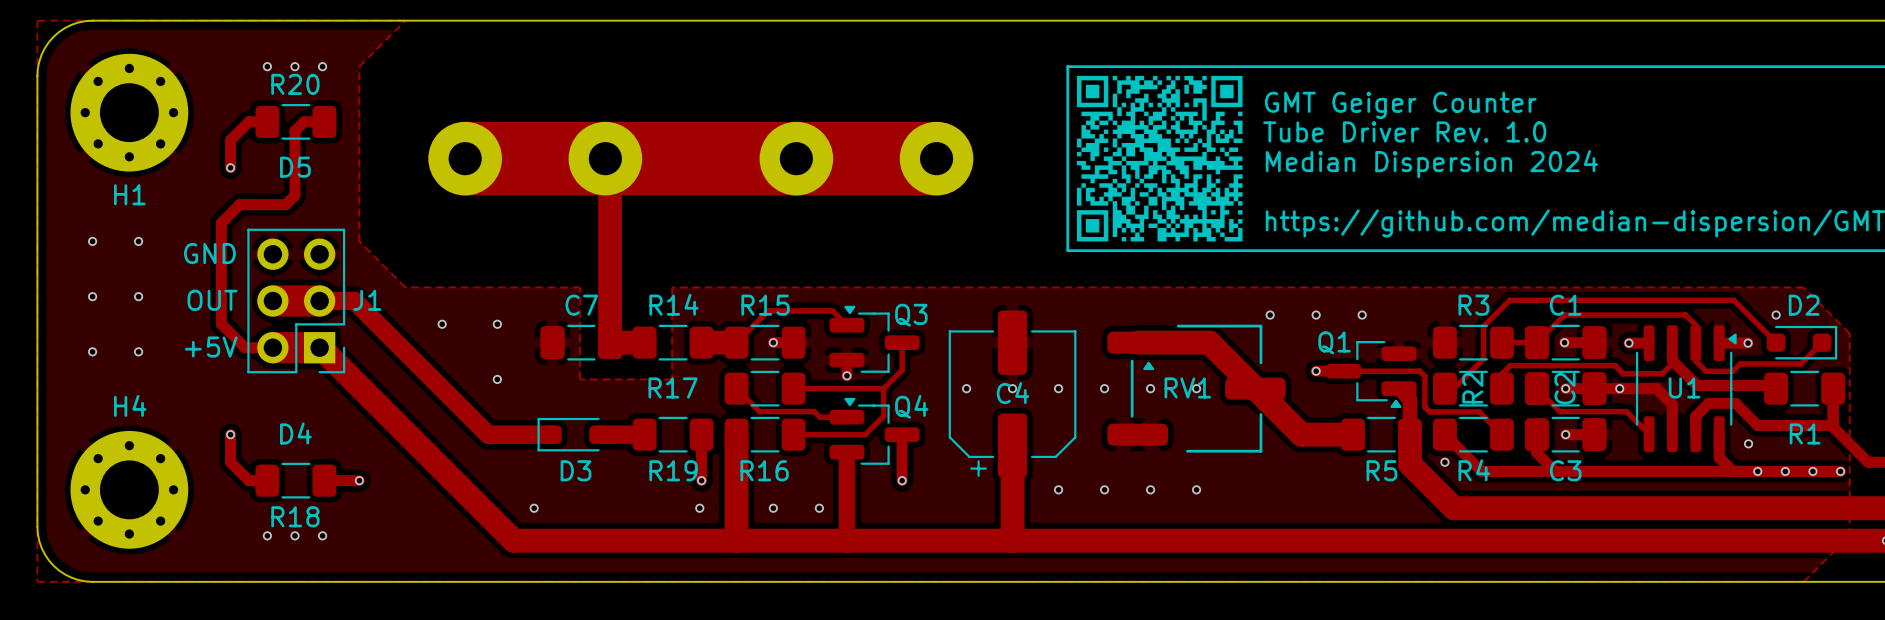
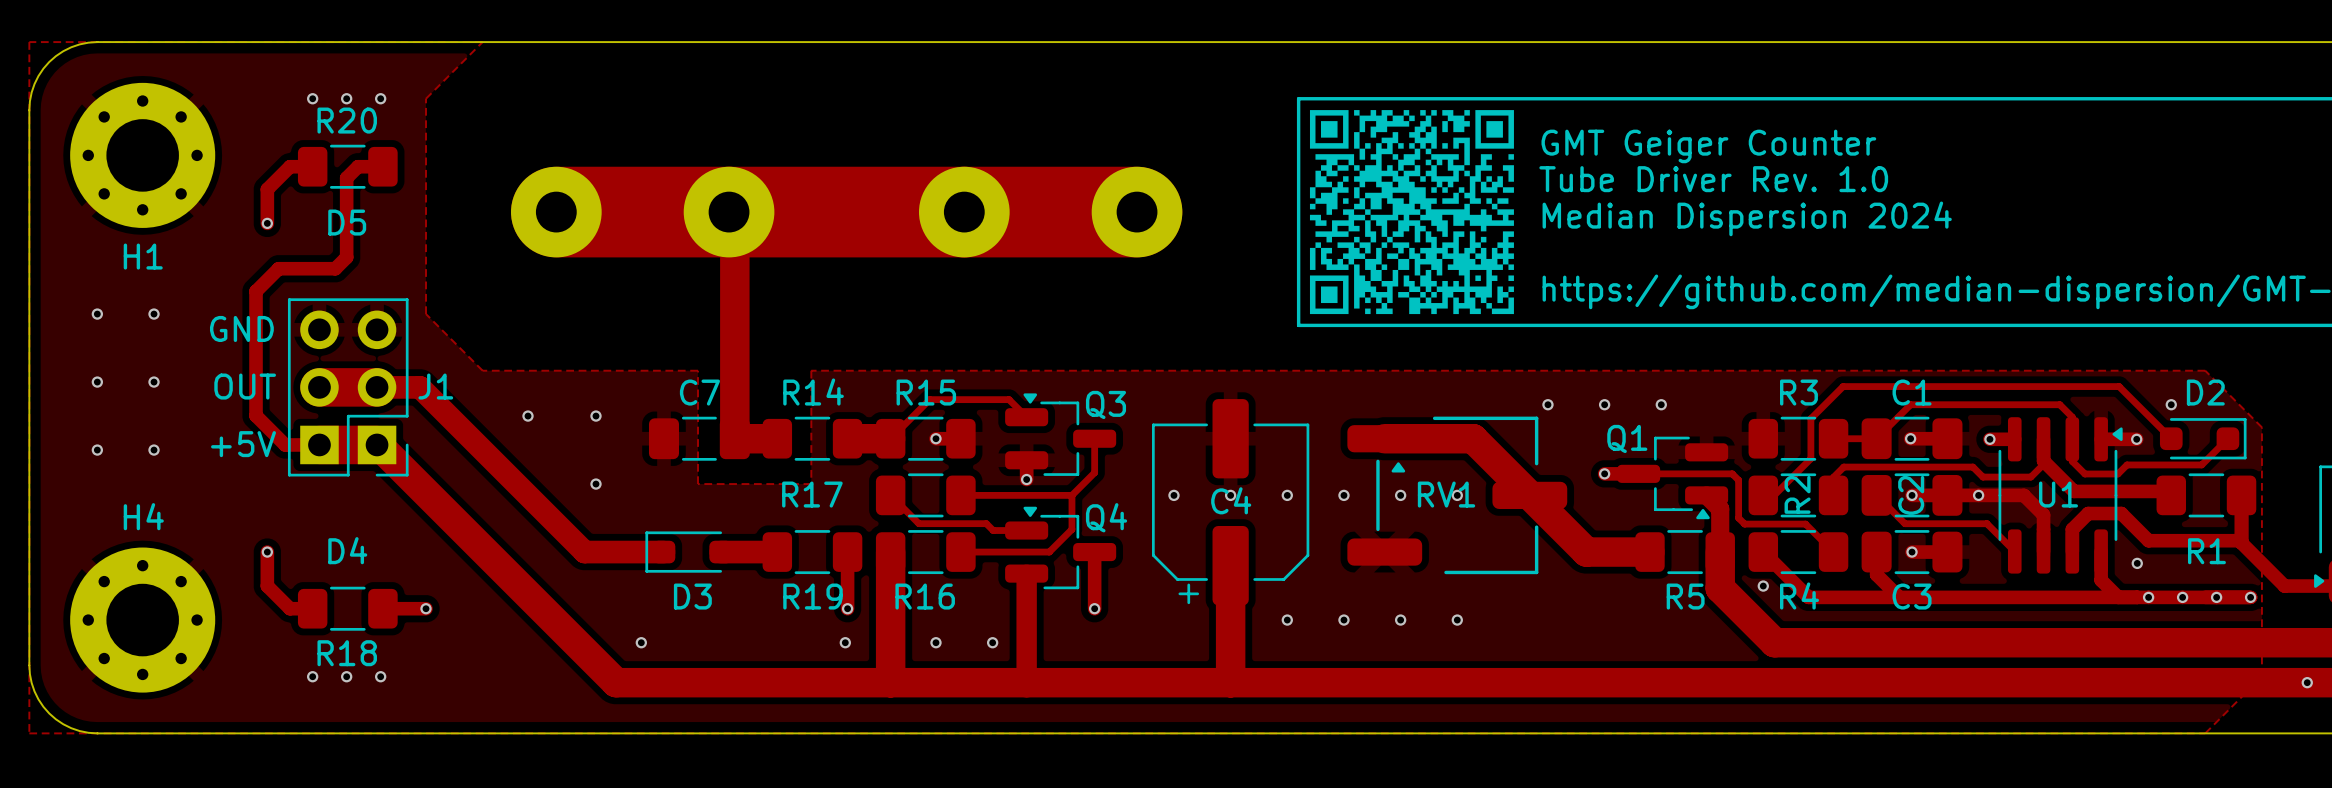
J1 footprint: [247, 228, 346, 374] -> [287, 298, 409, 477]

